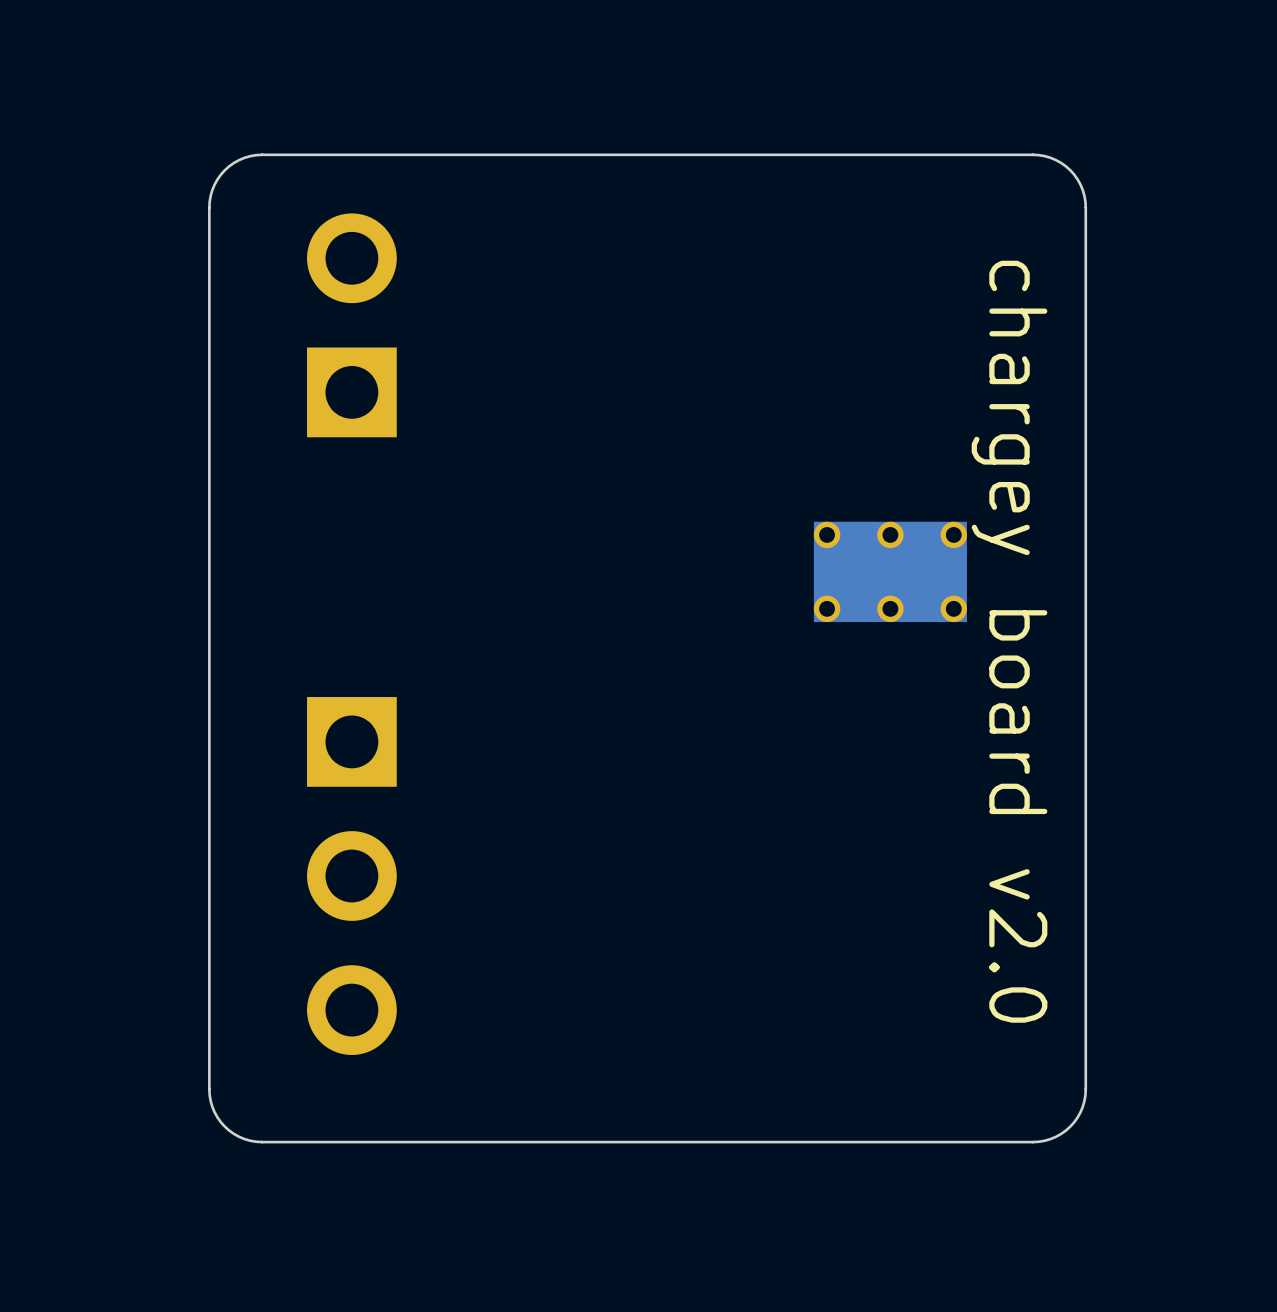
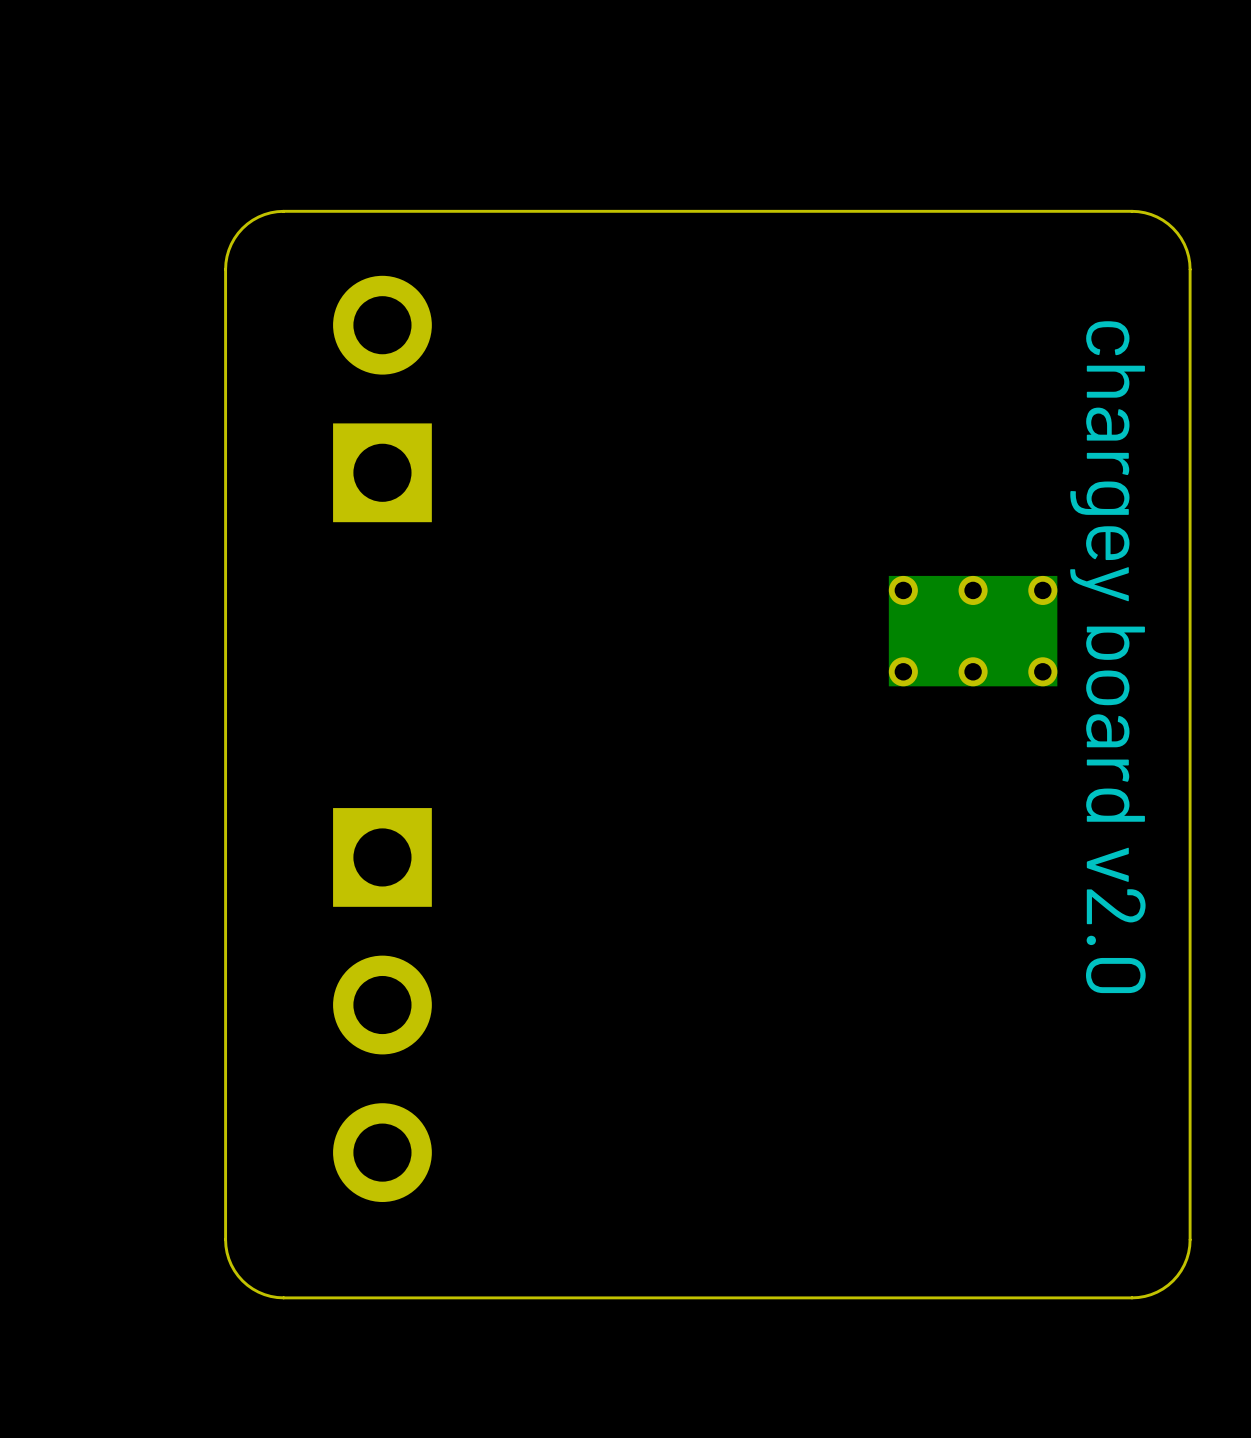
part position: (890, 571) -> (973, 631)

